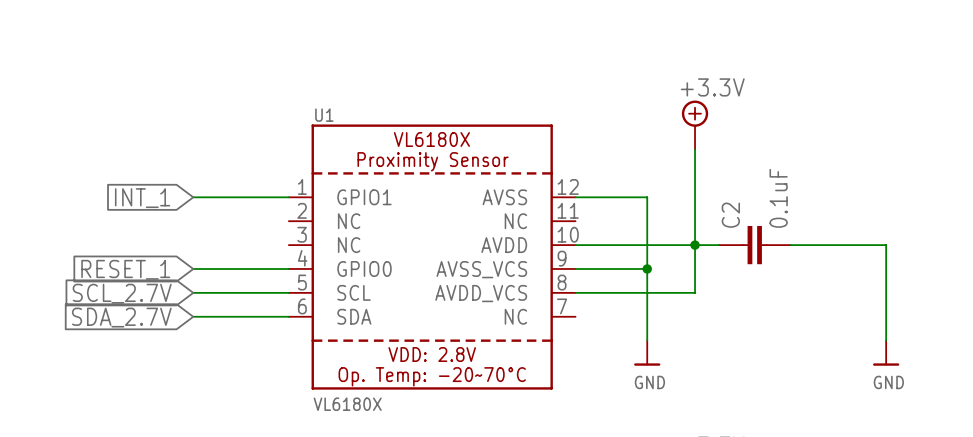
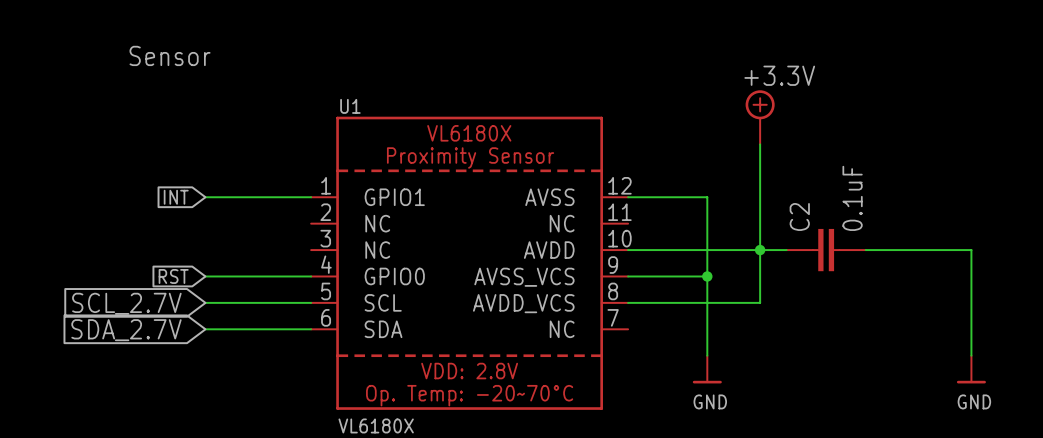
text: none -> Sensor (170, 55)
global label: INT_1 (142, 198) -> INT (176, 197)
global label: RESET_1 (125, 269) -> RST (173, 276)

